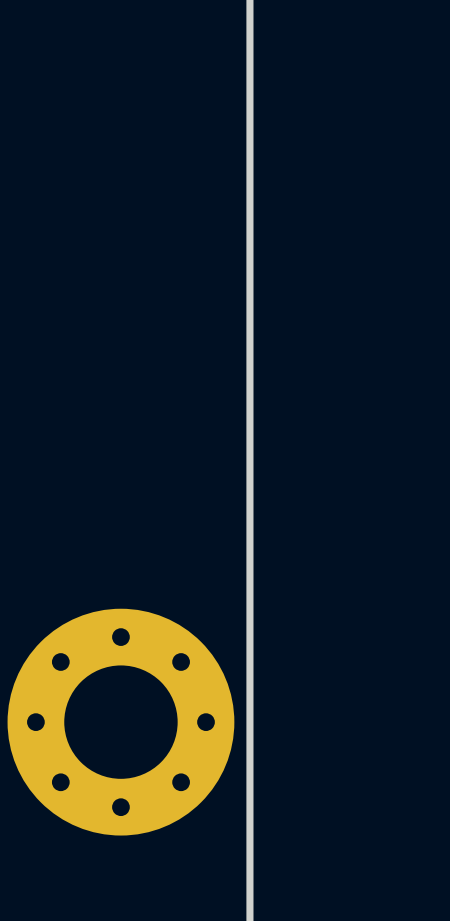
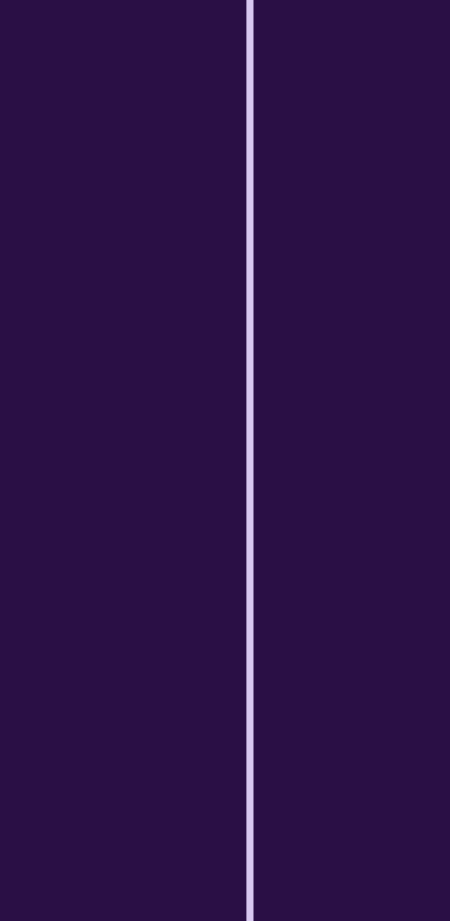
part: (120, 722) -> none

